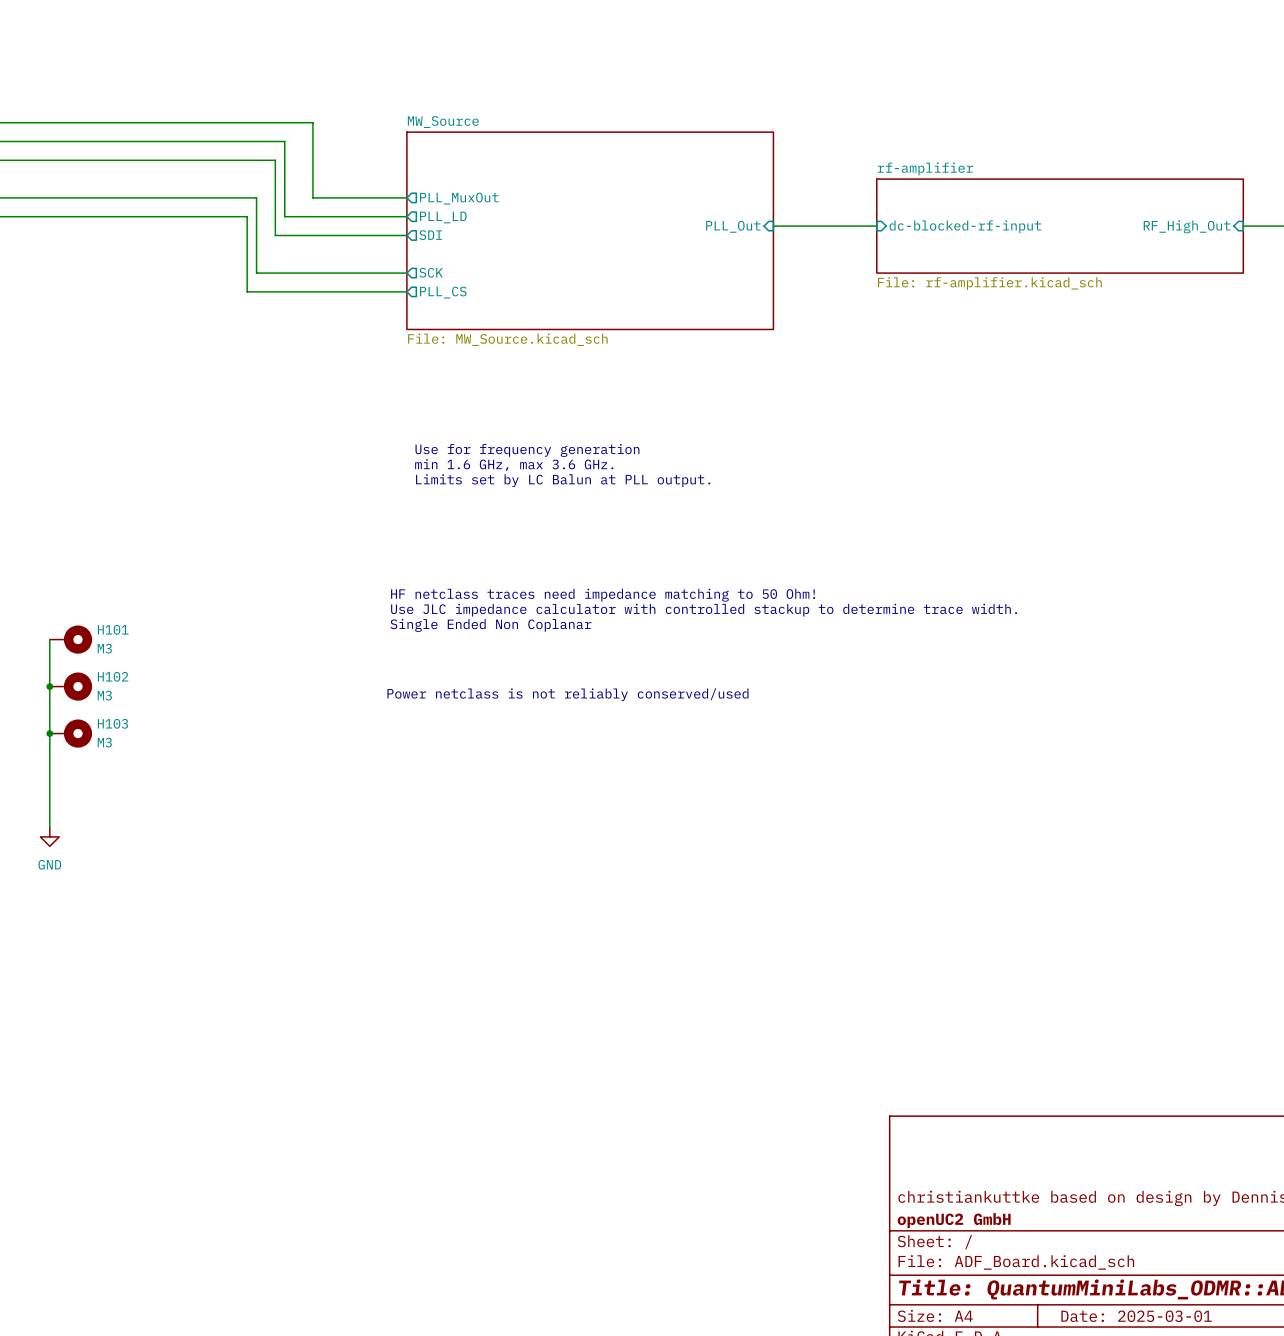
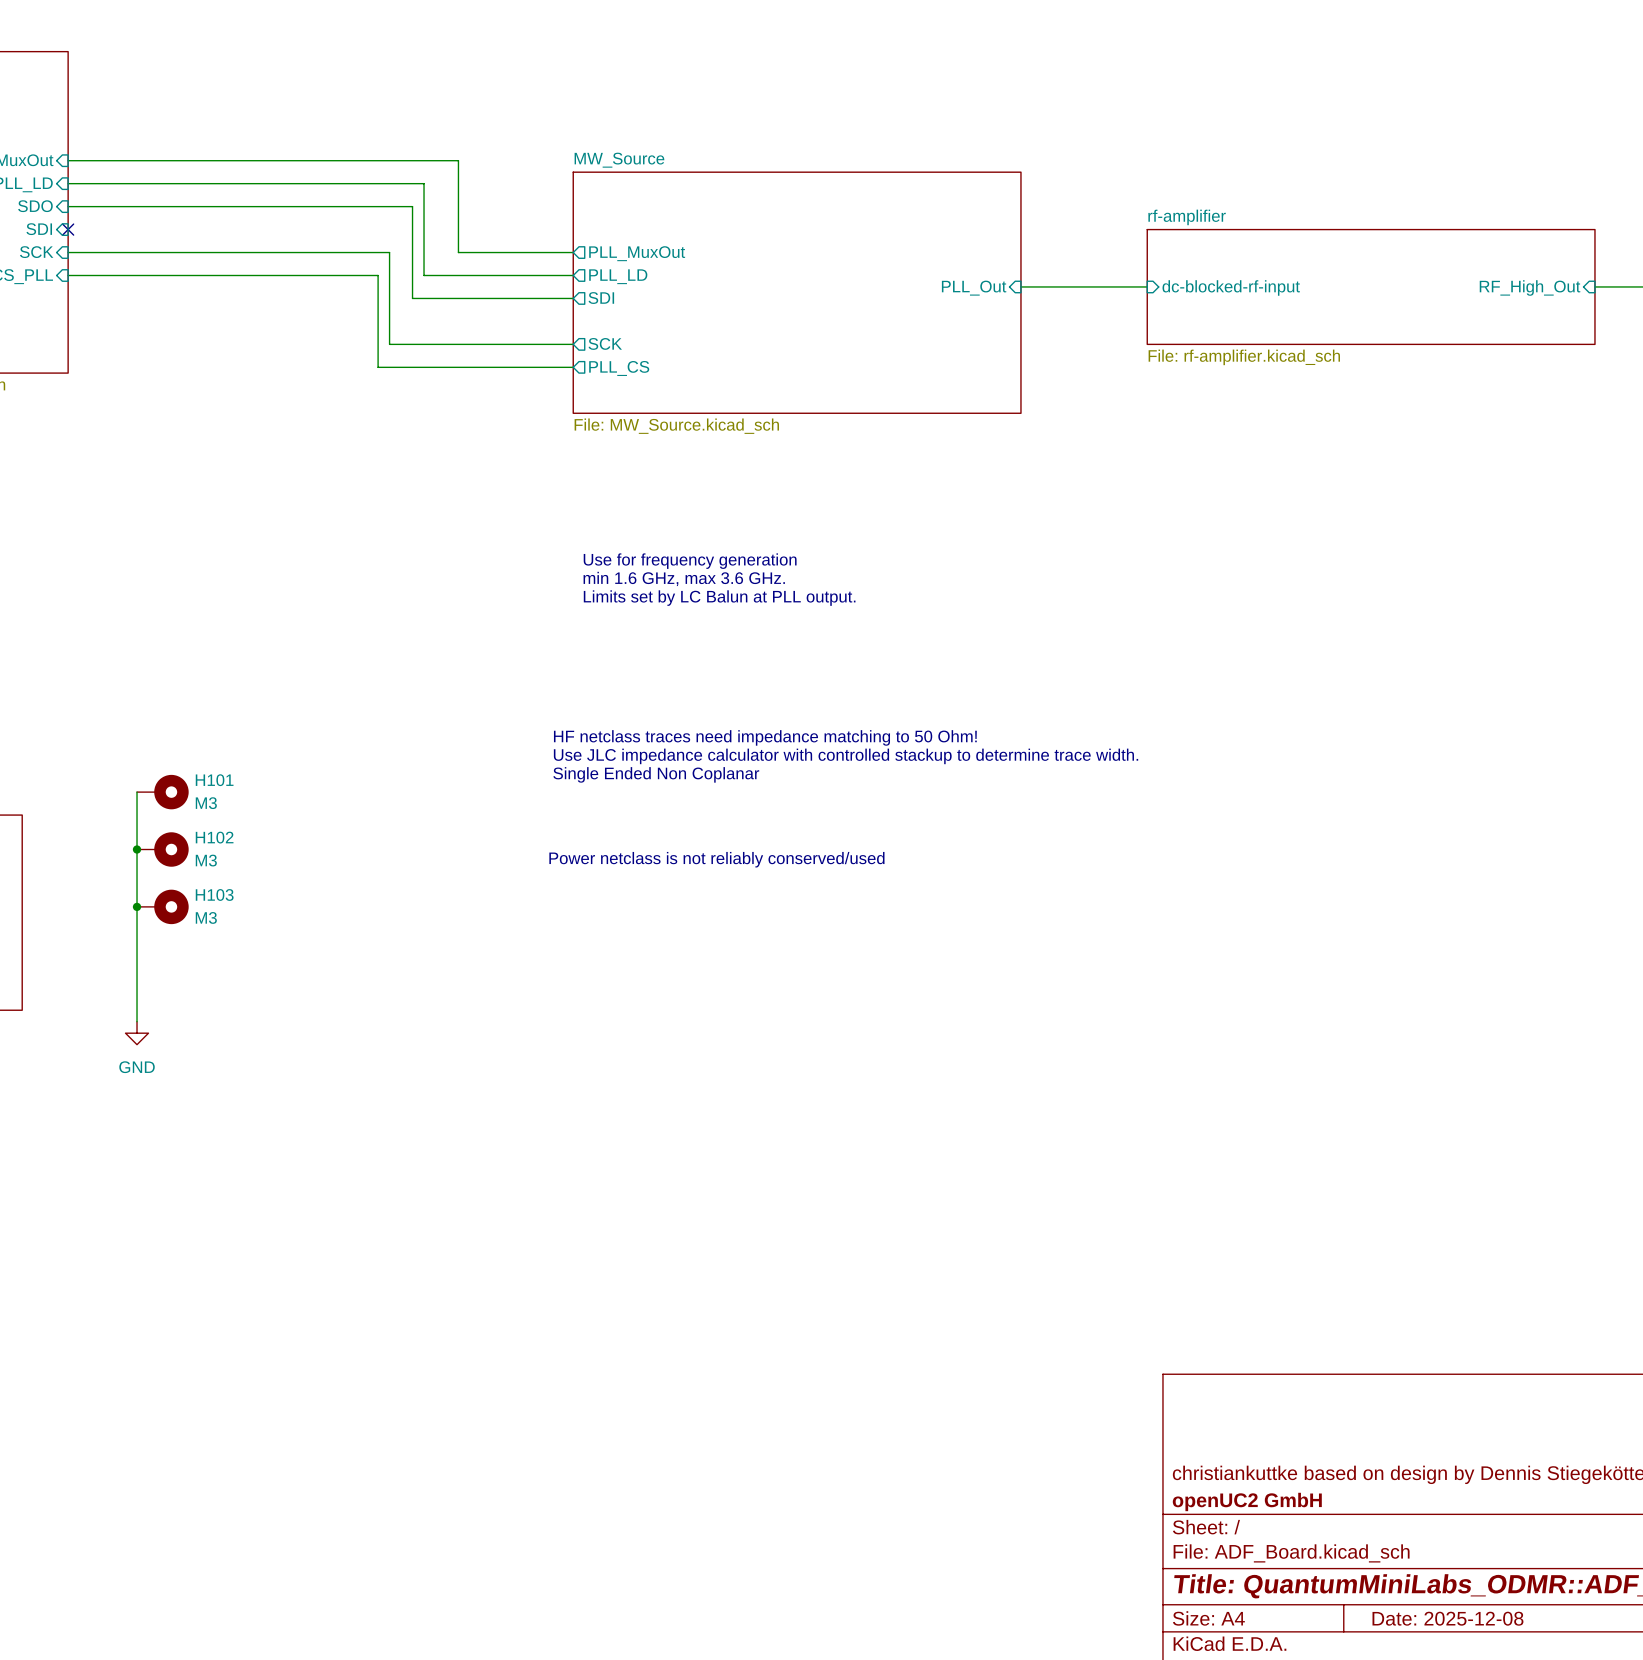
title block: Date: 2025-03-01 (1136, 1316) -> Date: 2025-12-08 (1447, 1618)

